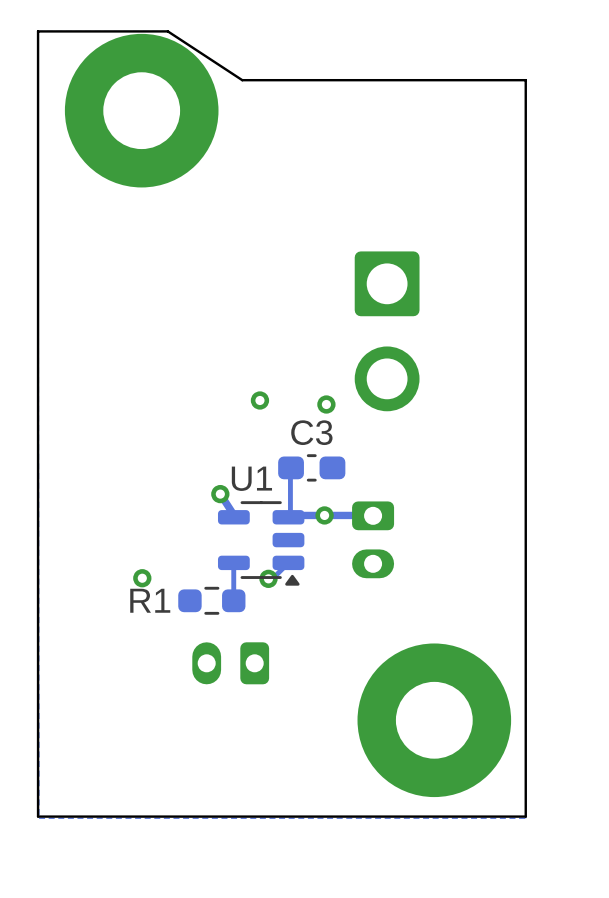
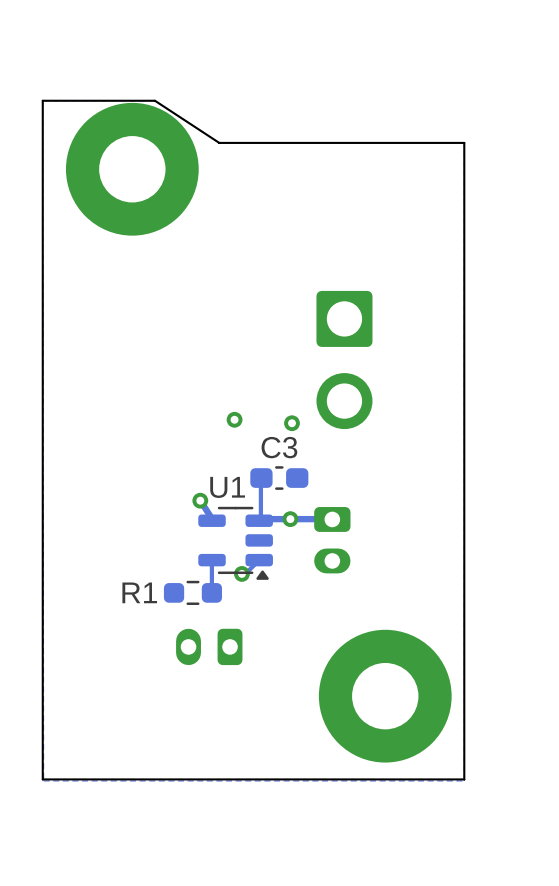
via: (142, 578) -> none

